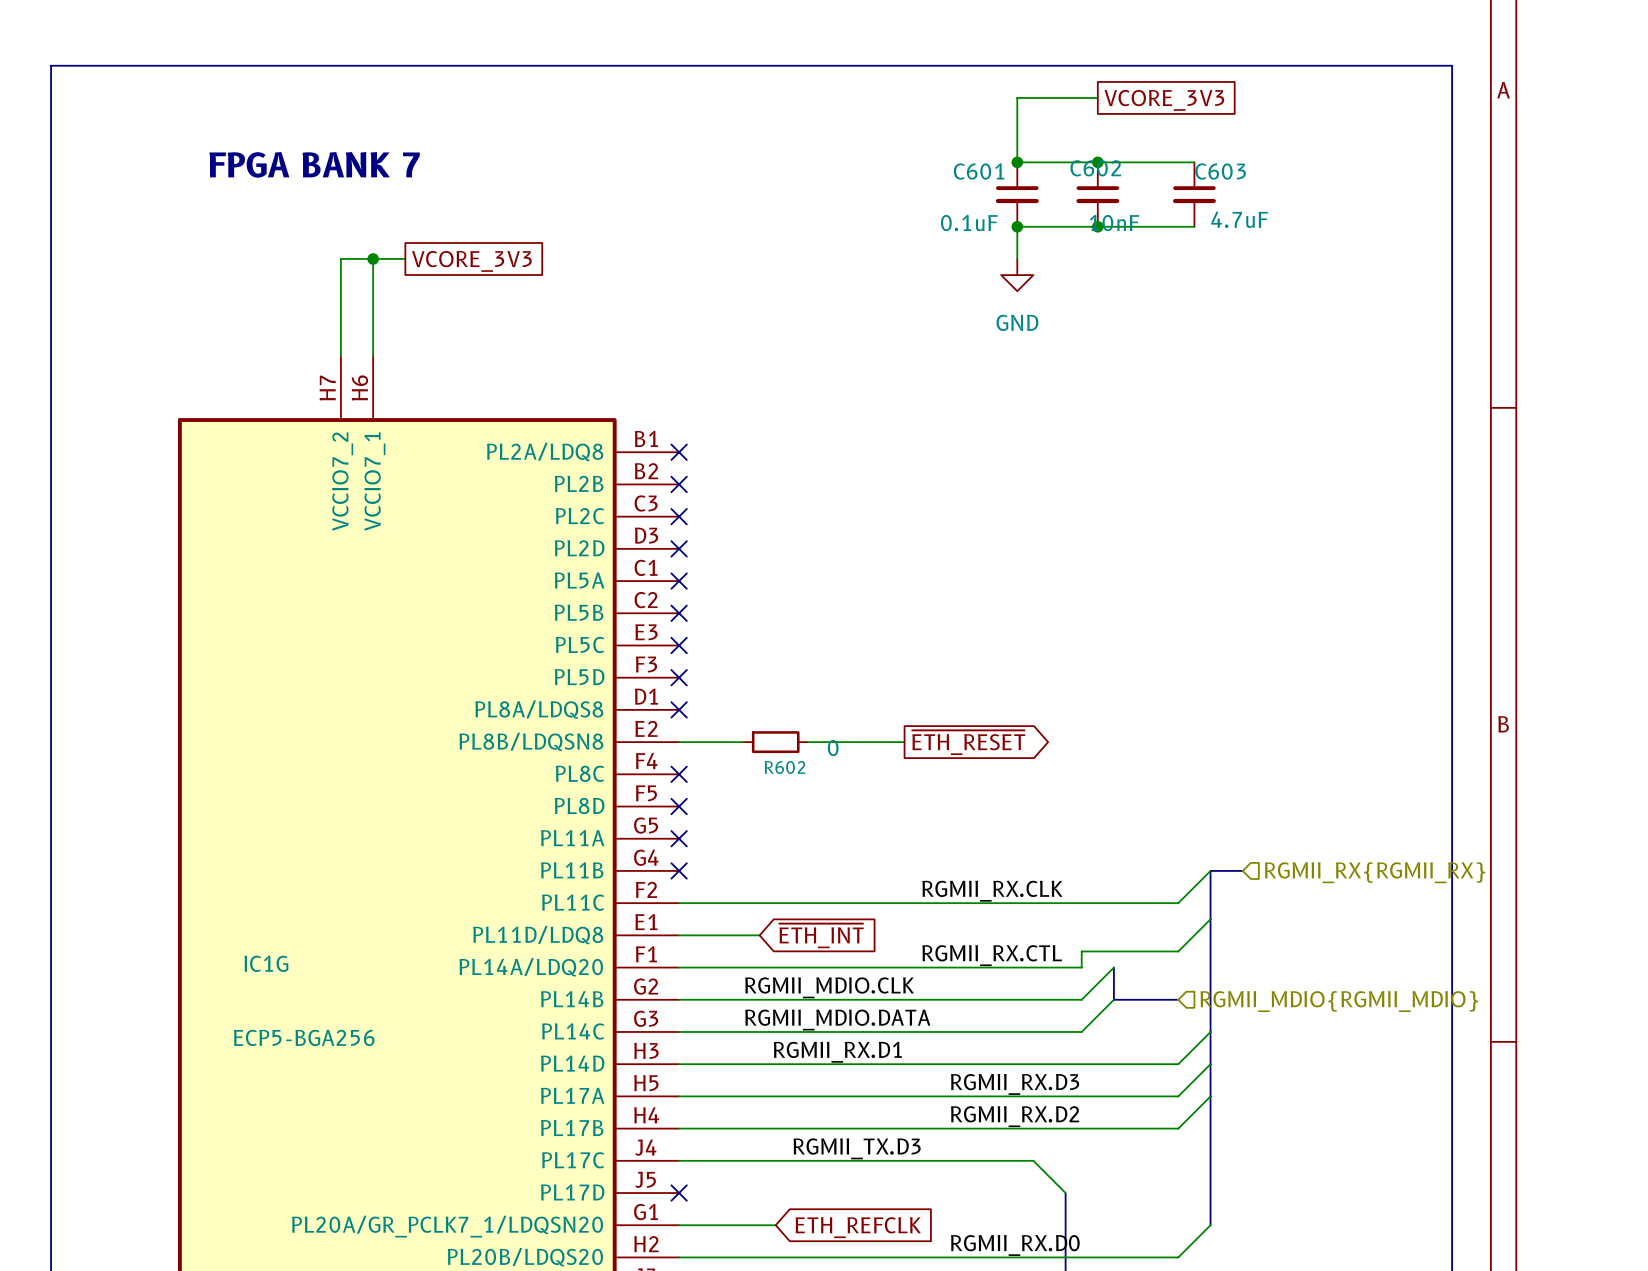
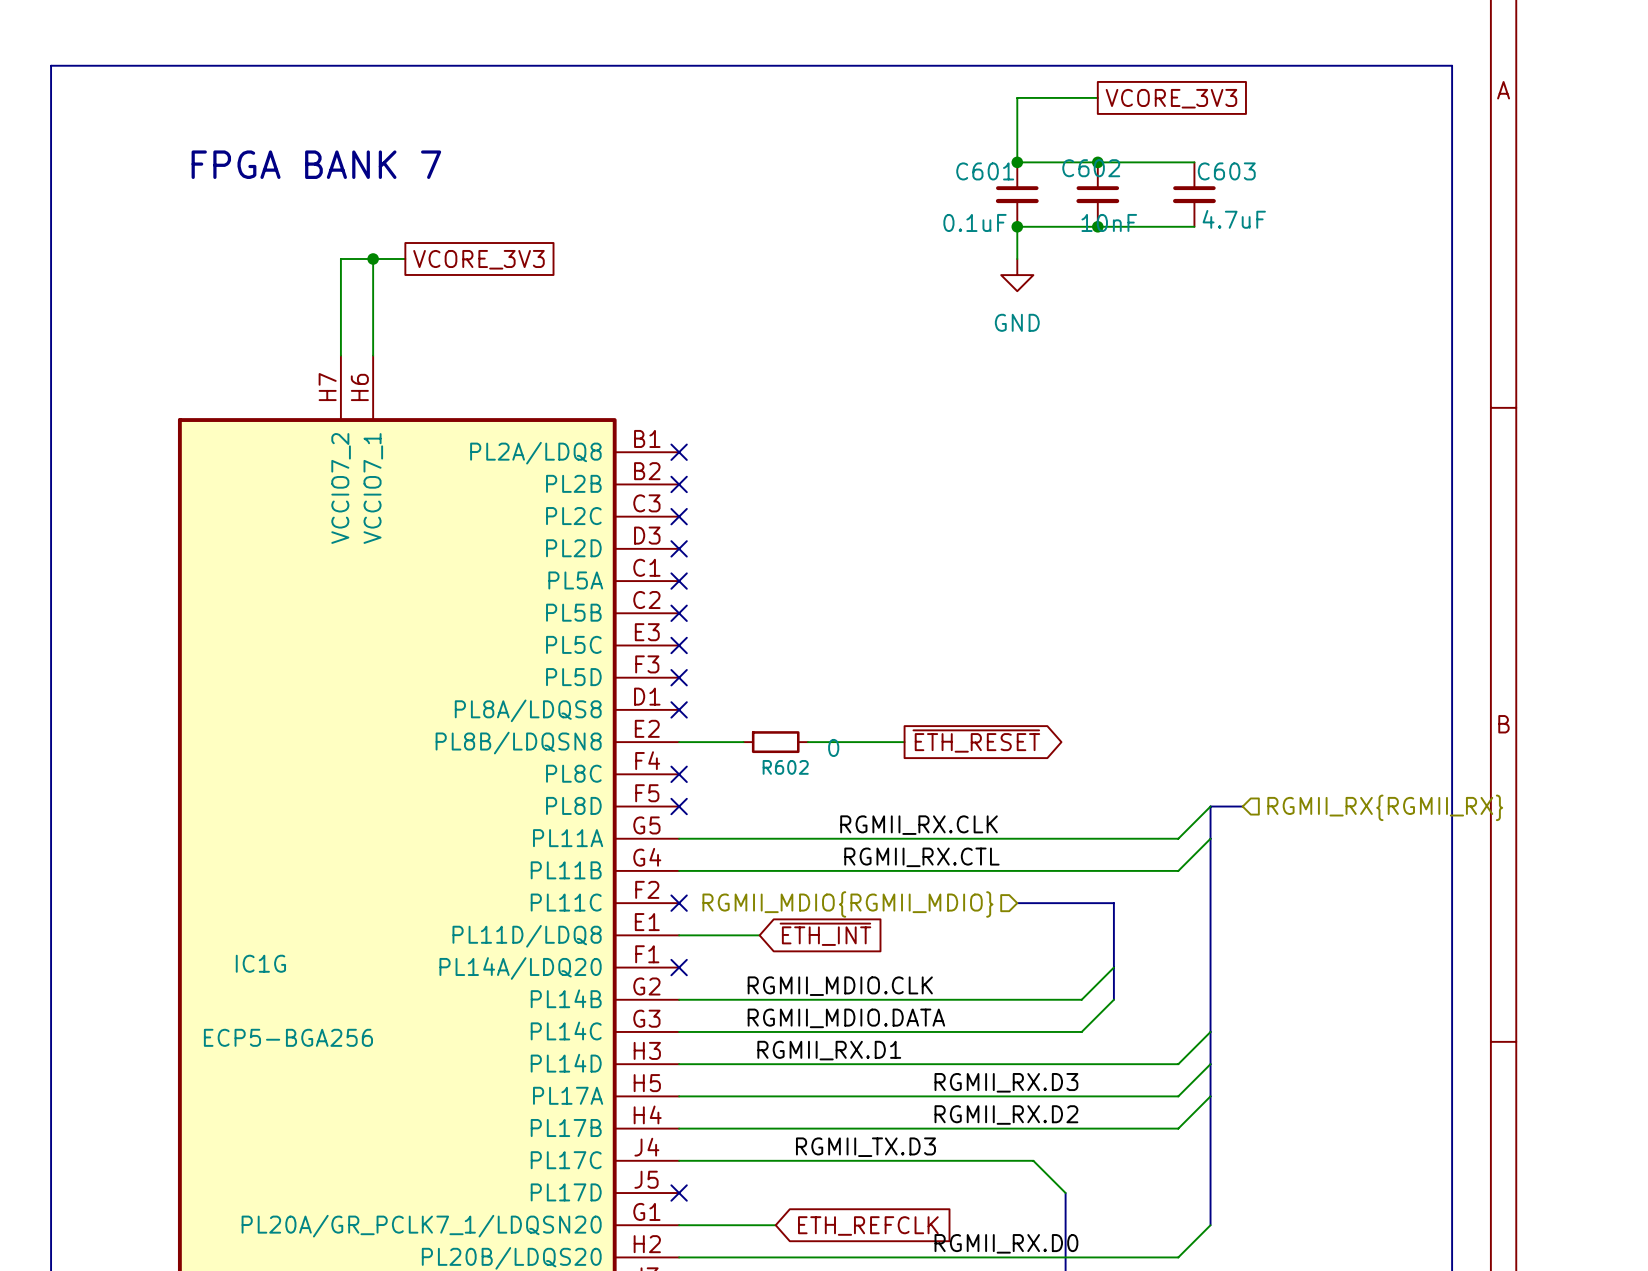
wire: none -> (1210, 806) (1178, 838) (679, 838)
no-connect mark: (679, 838) -> none
no-connect mark: (679, 870) -> none
wire: (1210, 870) (1178, 903) (679, 903) -> (1210, 838) (1178, 870) (679, 870)
bus: (1210, 870) (1242, 870) -> (1210, 870) (1210, 806) (1242, 806)
hierarchical label position: RGMII_RX{RGMII_RX} (1375, 872) -> RGMII_RX{RGMII_RX} (1385, 807)
label position: RGMII_RX.CLK (992, 891) -> RGMII_RX.CLK (919, 825)
no-connect mark: none -> (679, 903)
bus: none -> (1017, 903) (1113, 903) (1113, 967)
wire: (1210, 919) (1178, 951) (1081, 951) (1081, 967) (679, 967) -> none
label position: RGMII_RX.CTL (992, 955) -> RGMII_RX.CTL (921, 857)
no-connect mark: none -> (679, 967)
bus: (1113, 999) (1178, 999) -> none
hierarchical label rotation: 0° (1339, 1001) -> 180° (847, 904)
hierarchical label position: RGMII_MDIO{RGMII_MDIO} (1339, 1001) -> RGMII_MDIO{RGMII_MDIO} (847, 904)

